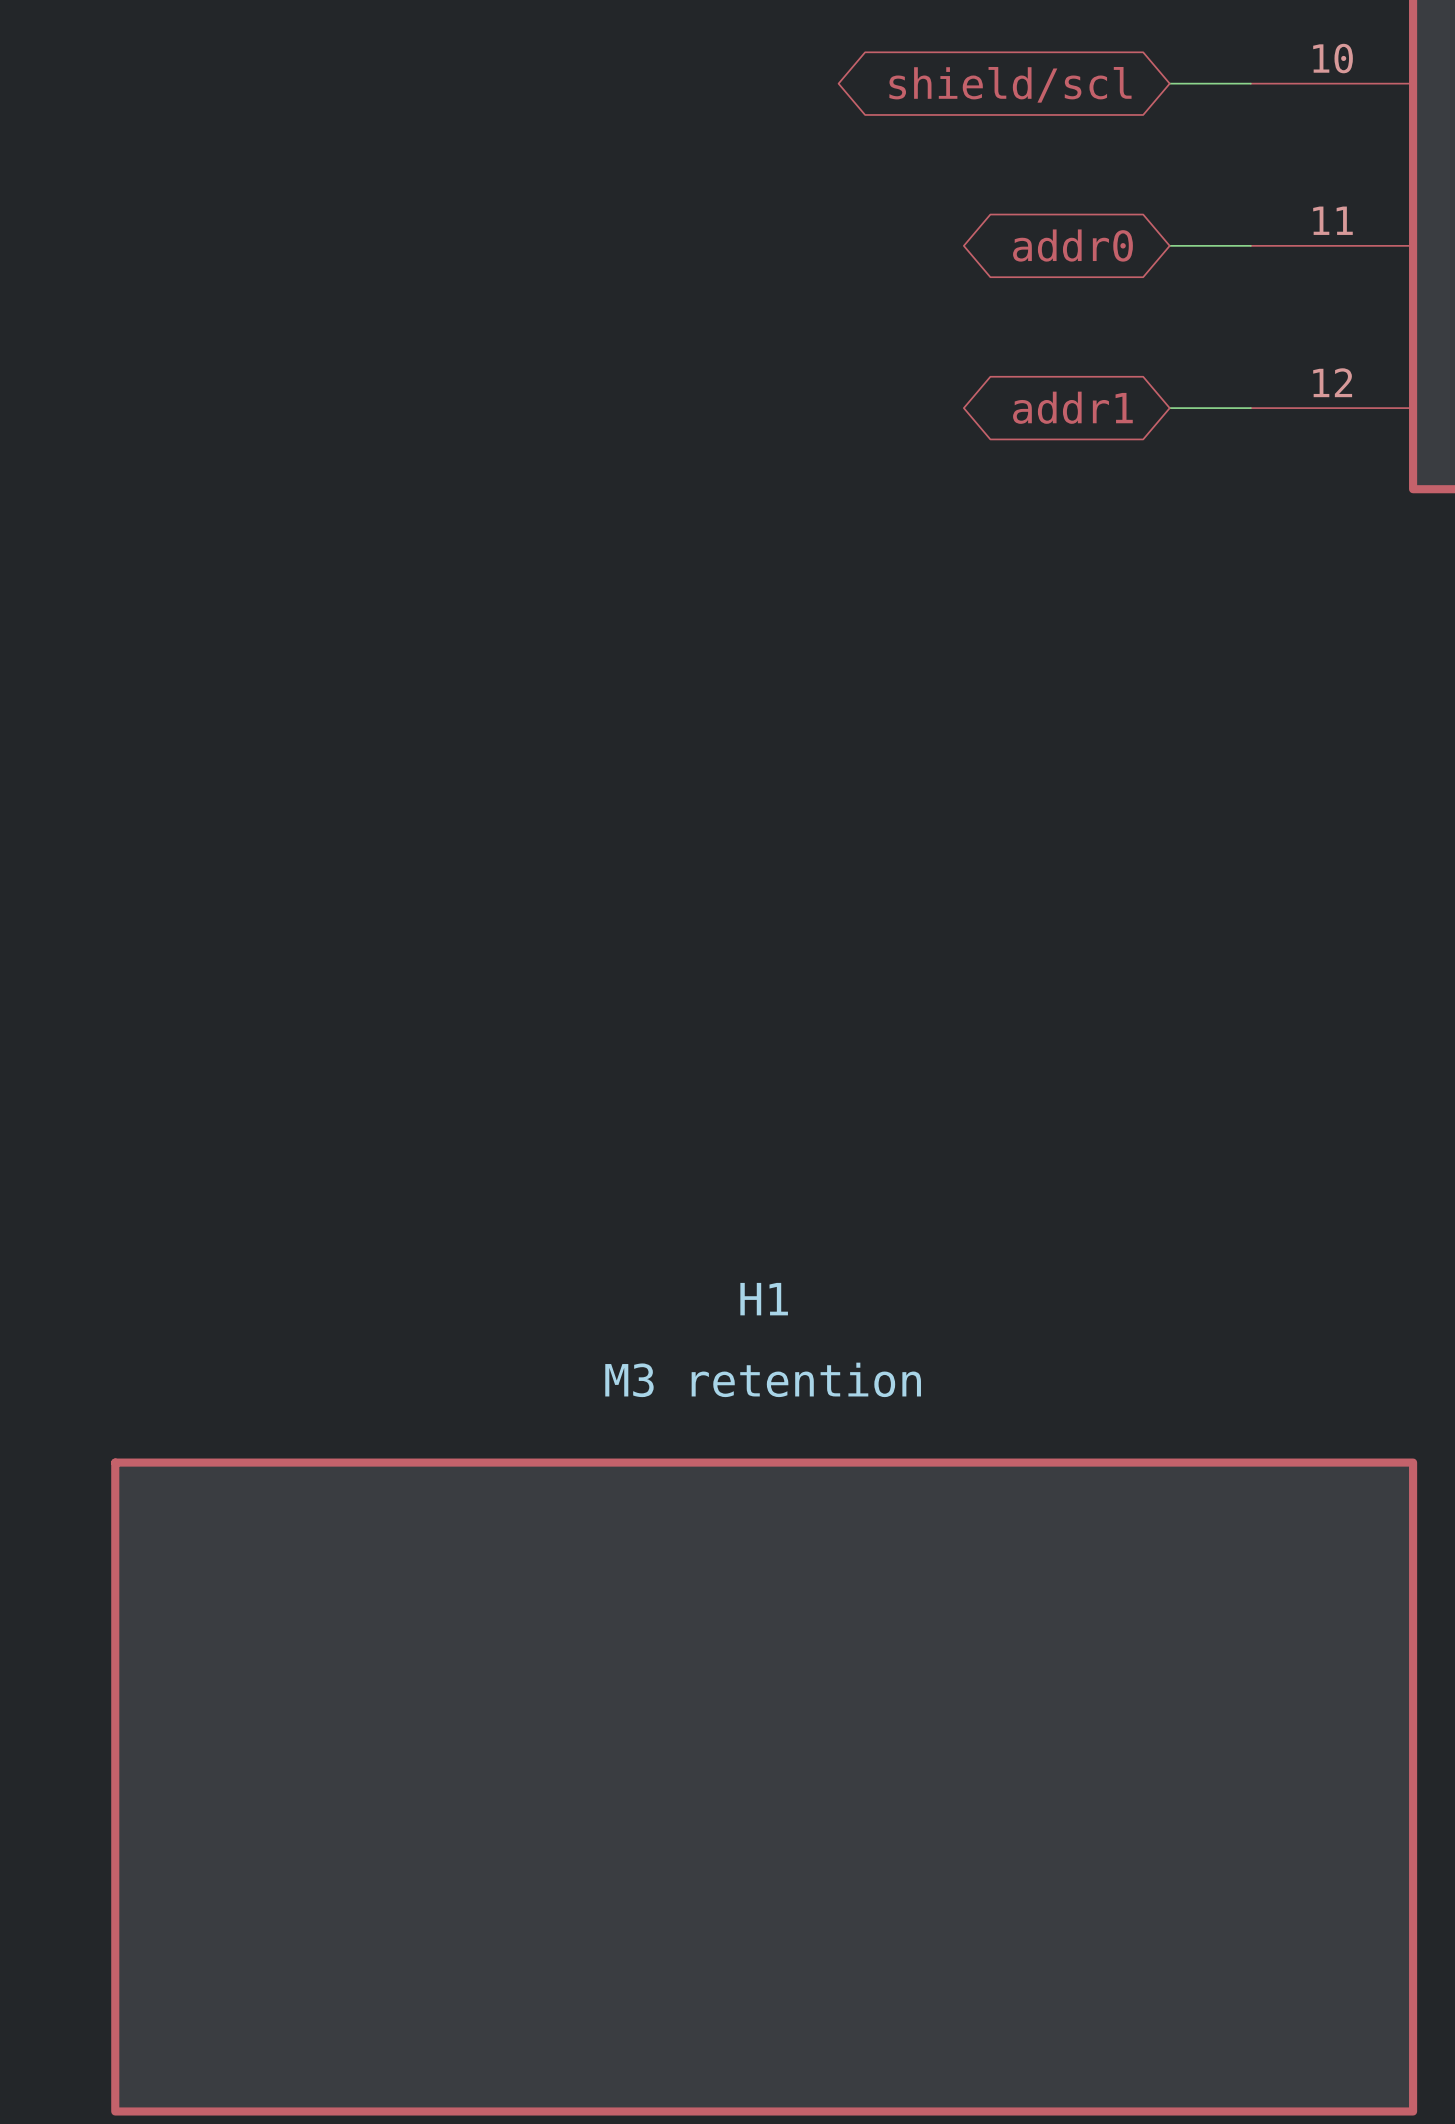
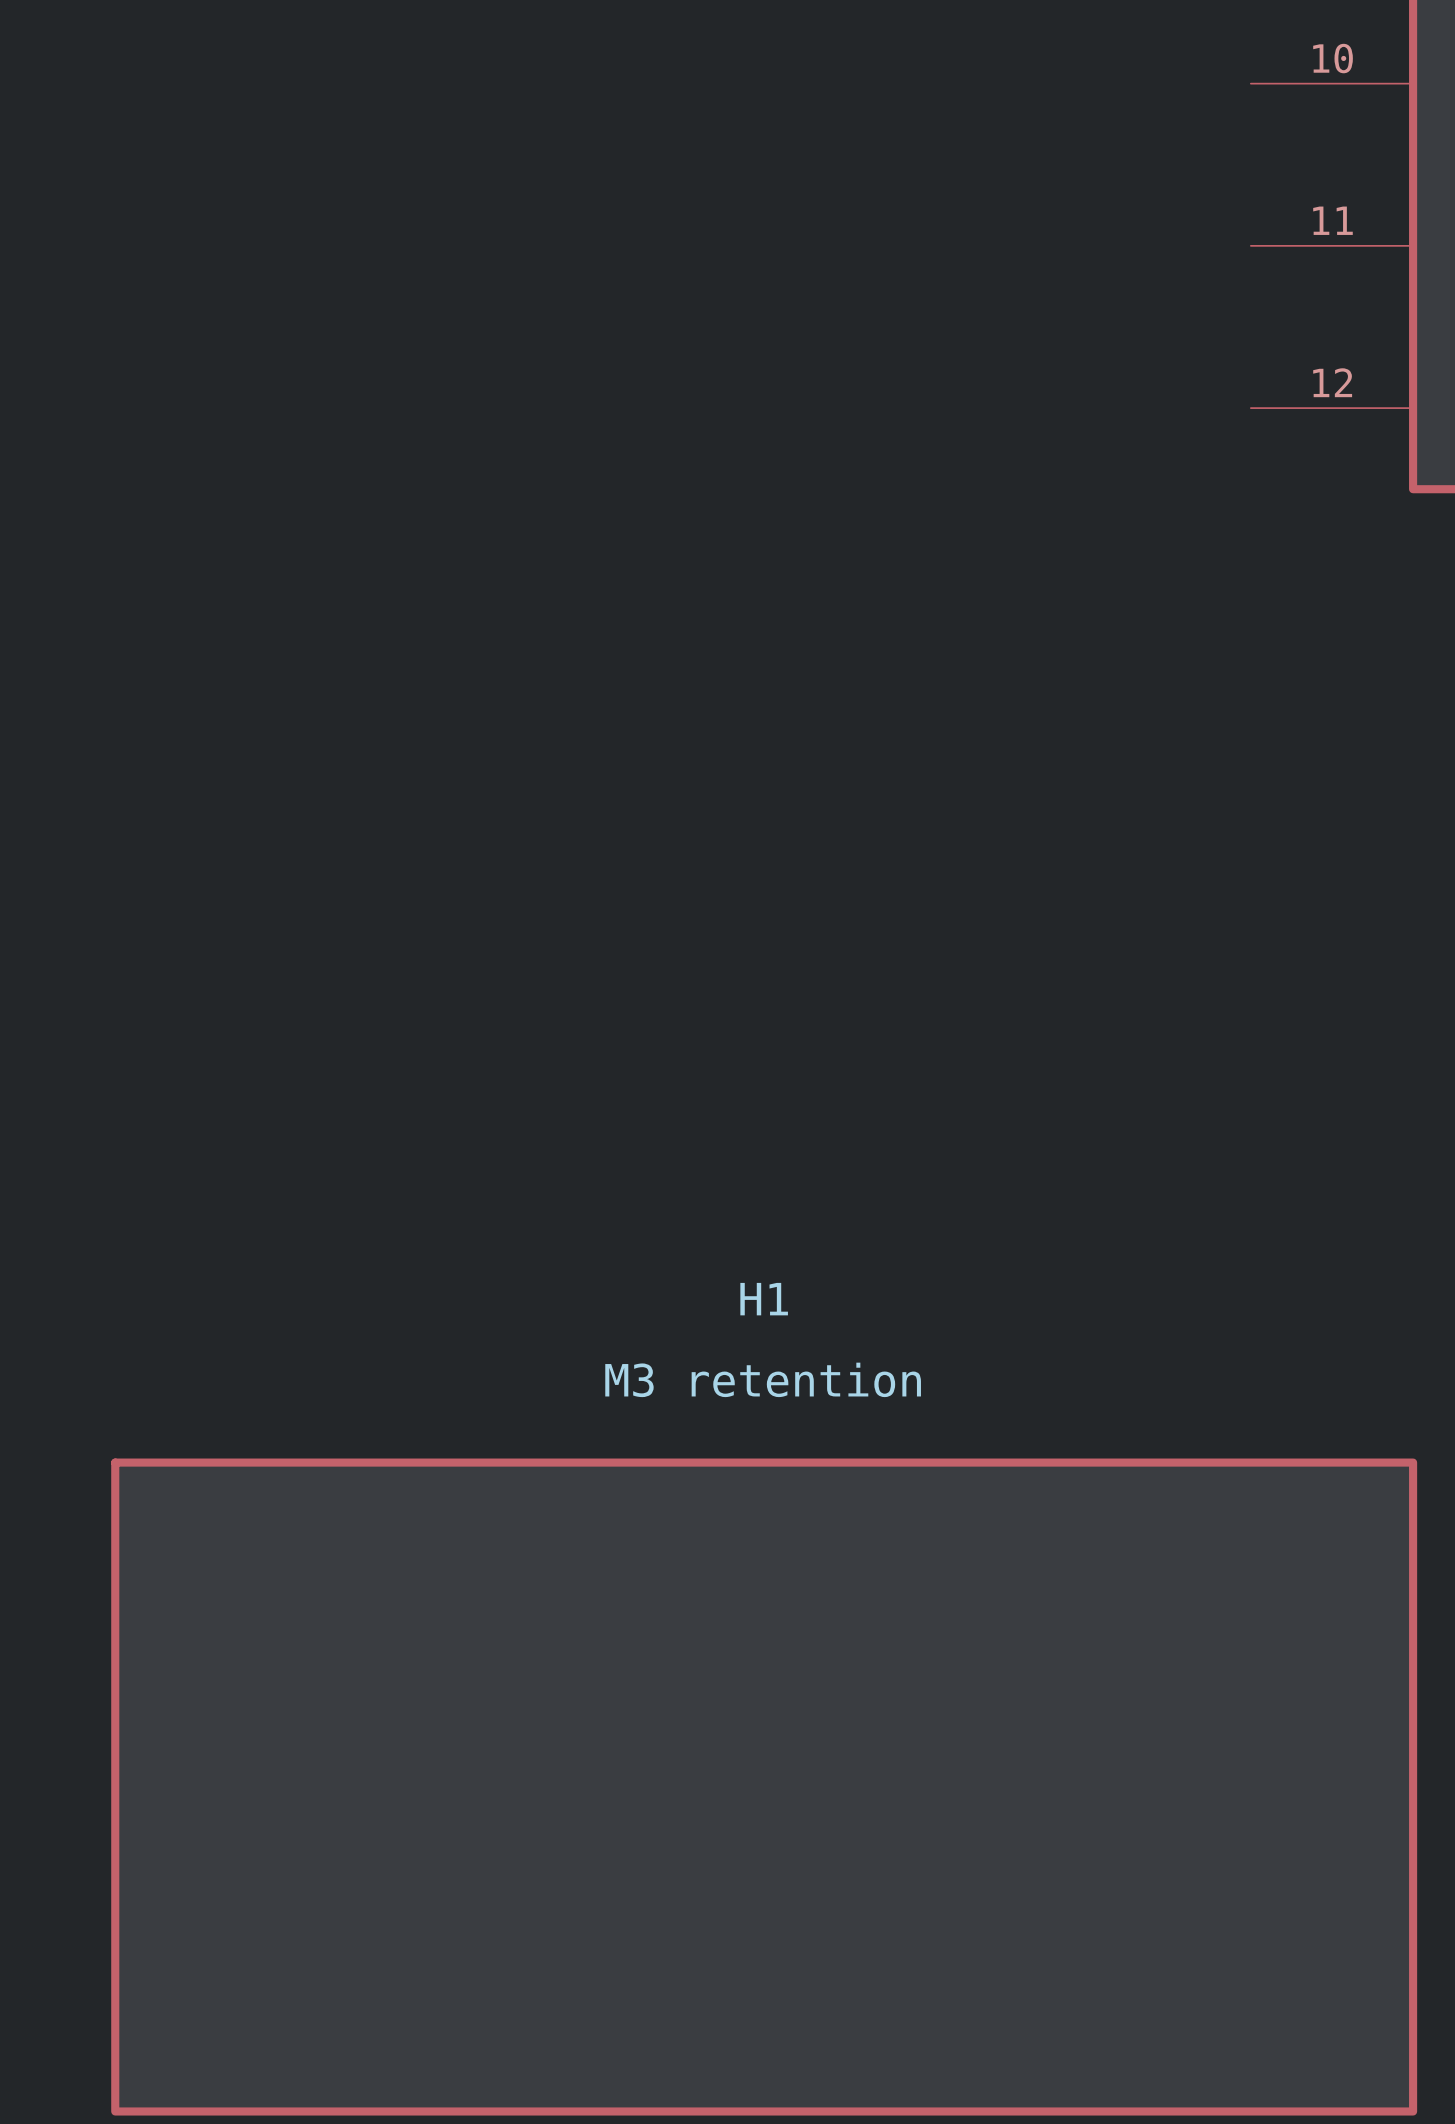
wire: (1169, 83) (1250, 83) -> none
global label: shield/scl (1010, 84) -> none
global label: addr0 (1072, 245) -> none
wire: (1169, 245) (1250, 245) -> none
global label: addr1 (1072, 407) -> none
wire: (1169, 408) (1250, 408) -> none

